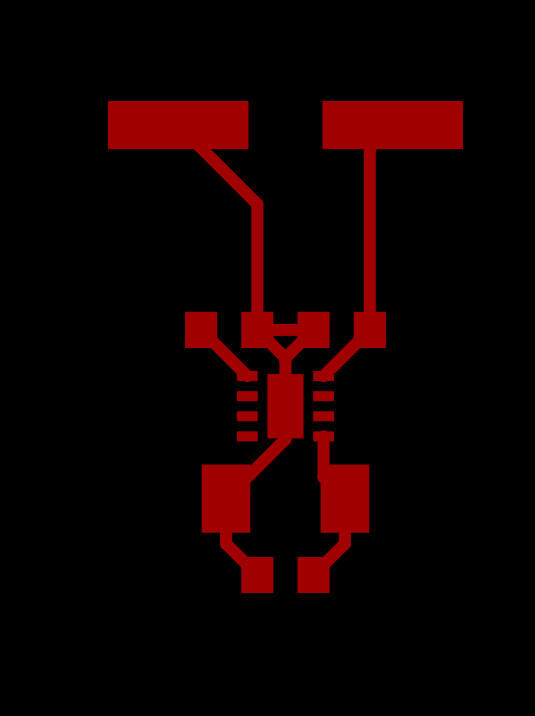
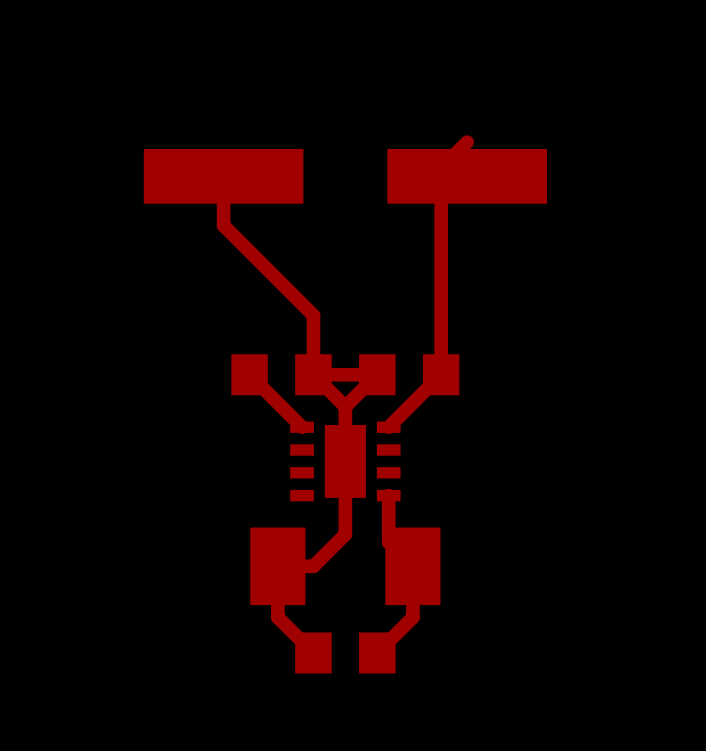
top track: (178, 125) (257, 204) (257, 277) -> (223, 176) (223, 225) (313, 315)
part position: (285, 125) -> (345, 176)
top track: (285, 439) (225, 498) -> (345, 498) (345, 534) (313, 566) (277, 566)

